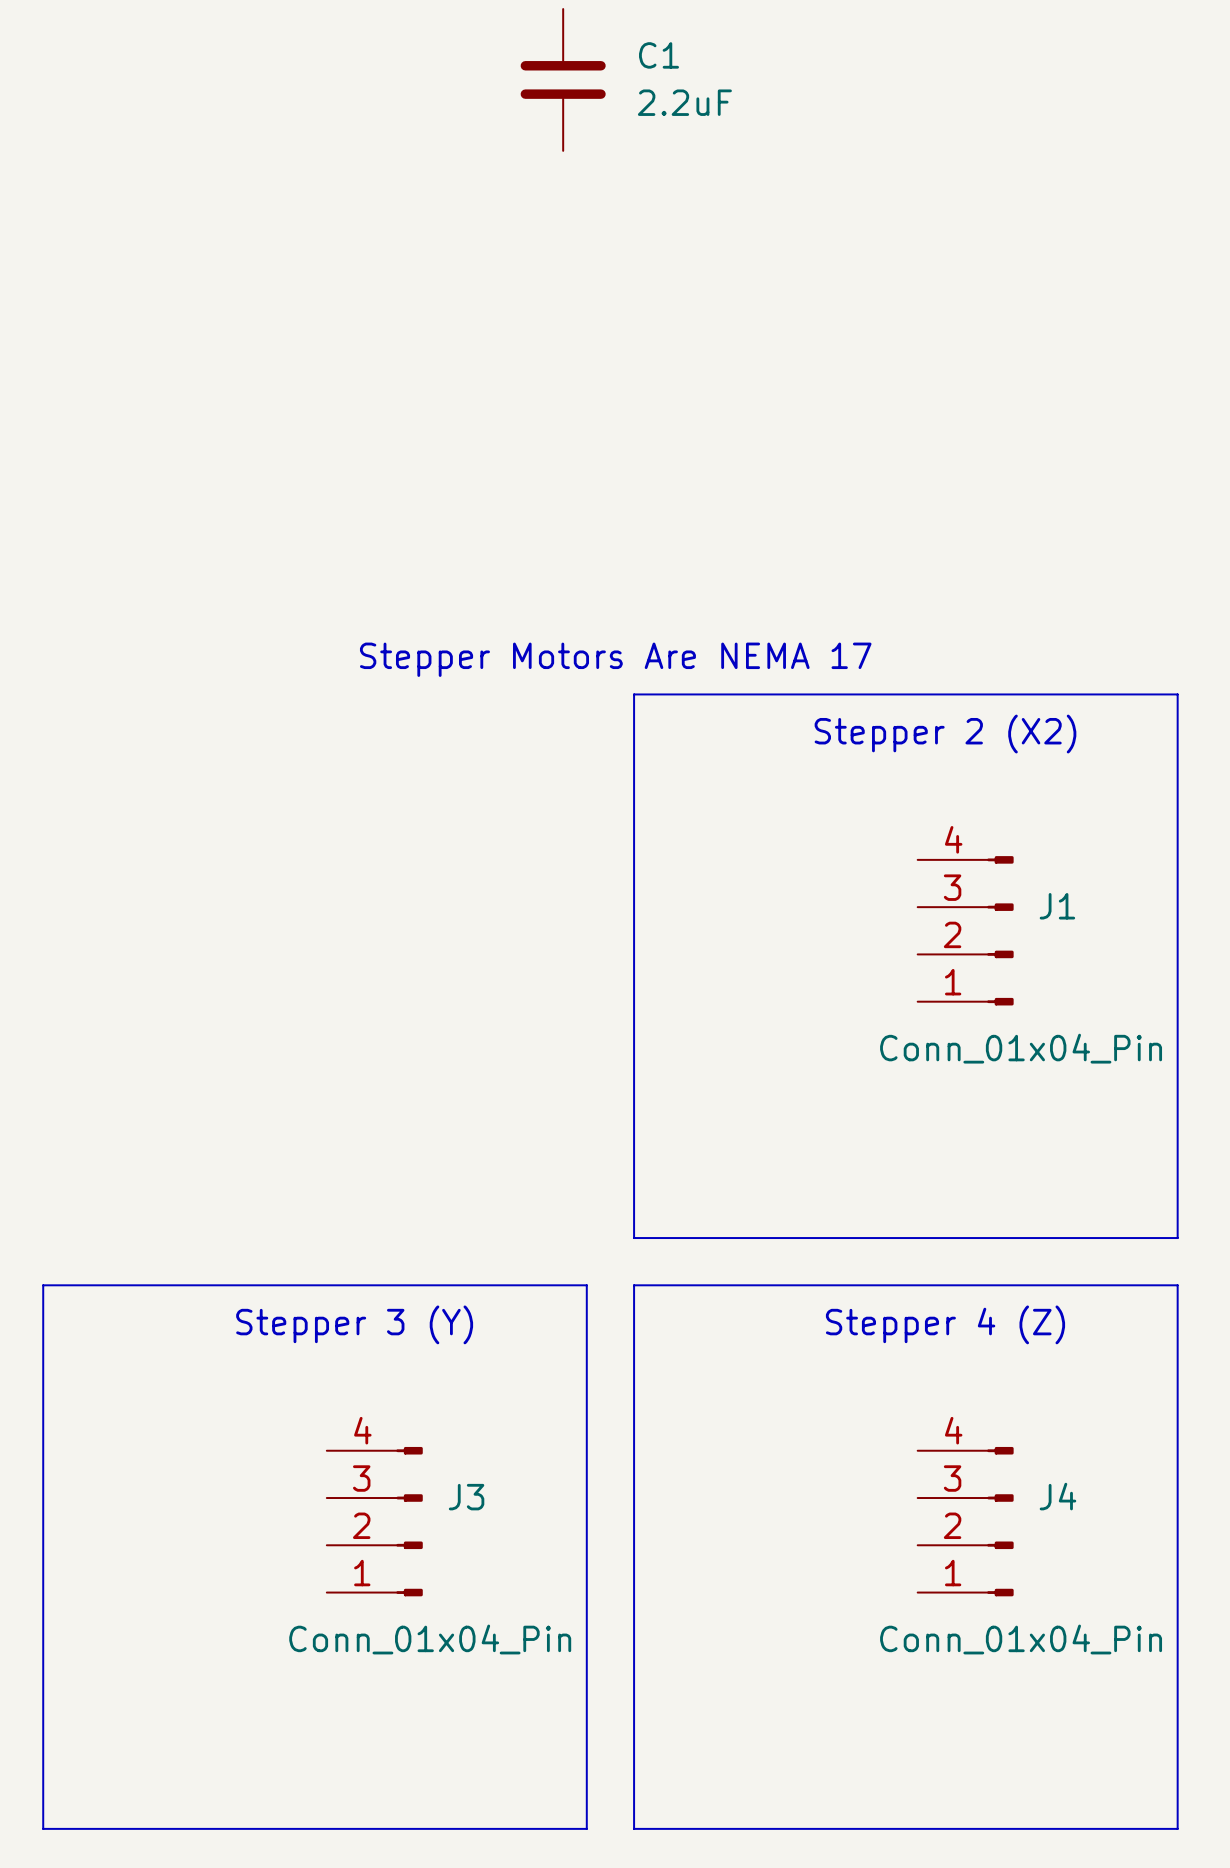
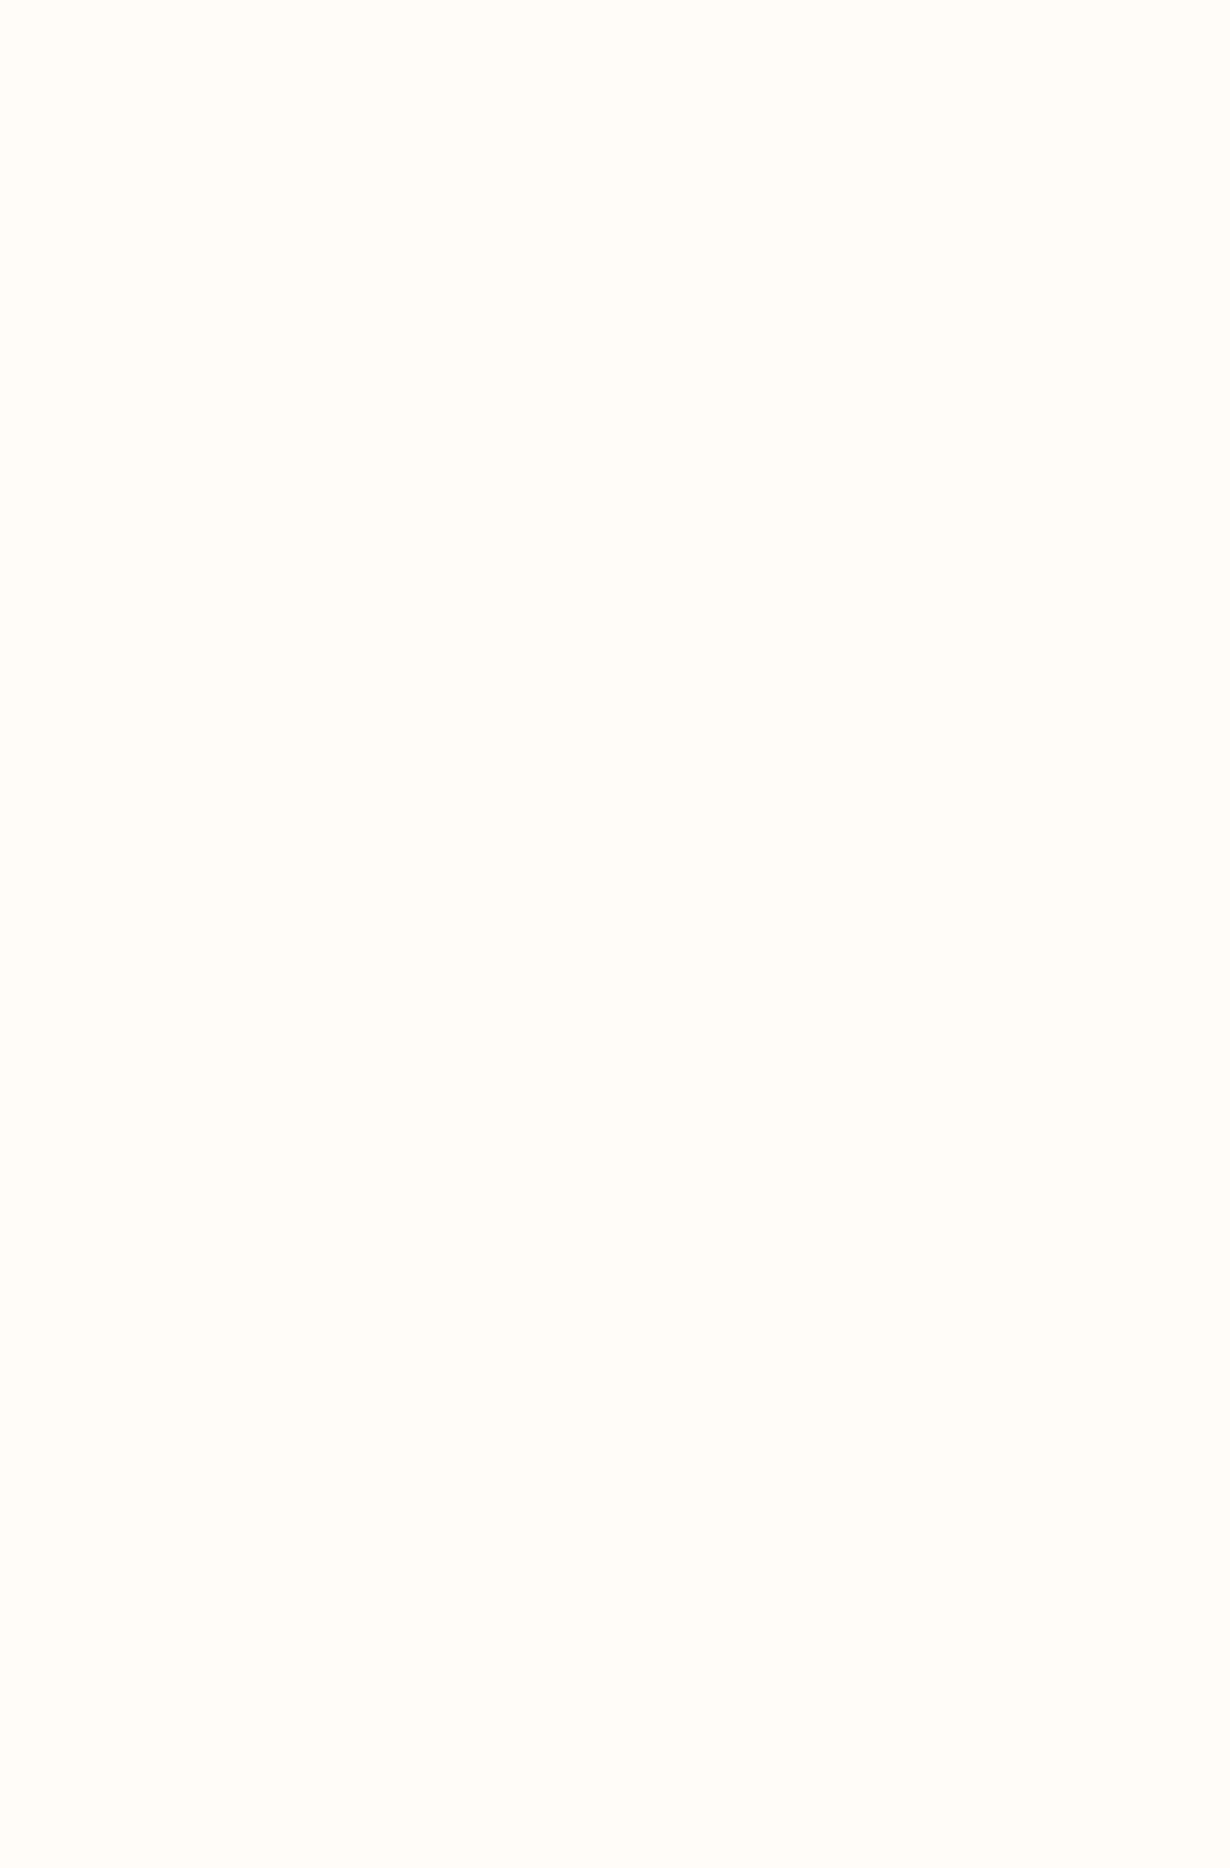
C1: 2.2uF (563, 79) -> none
text: Stepper Motors Are NEMA 17 (615, 659) -> none
line: (634, 694) (634, 1238) (1177, 1238) (1177, 694) (634, 694) -> none
text: Stepper 2 (X2) (945, 734) -> none
J1: Conn_01x04_Pin (965, 930) -> none
line: (43, 1285) (586, 1285) (586, 1828) (43, 1828) (43, 1285) -> none
line: (634, 1285) (1177, 1285) (1177, 1828) (634, 1828) (634, 1285) -> none
text: Stepper 3 (Y) (354, 1324) -> none
text: Stepper 4 (Z) (945, 1324) -> none
J3: Conn_01x04_Pin (374, 1521) -> none
J4: Conn_01x04_Pin (965, 1521) -> none

